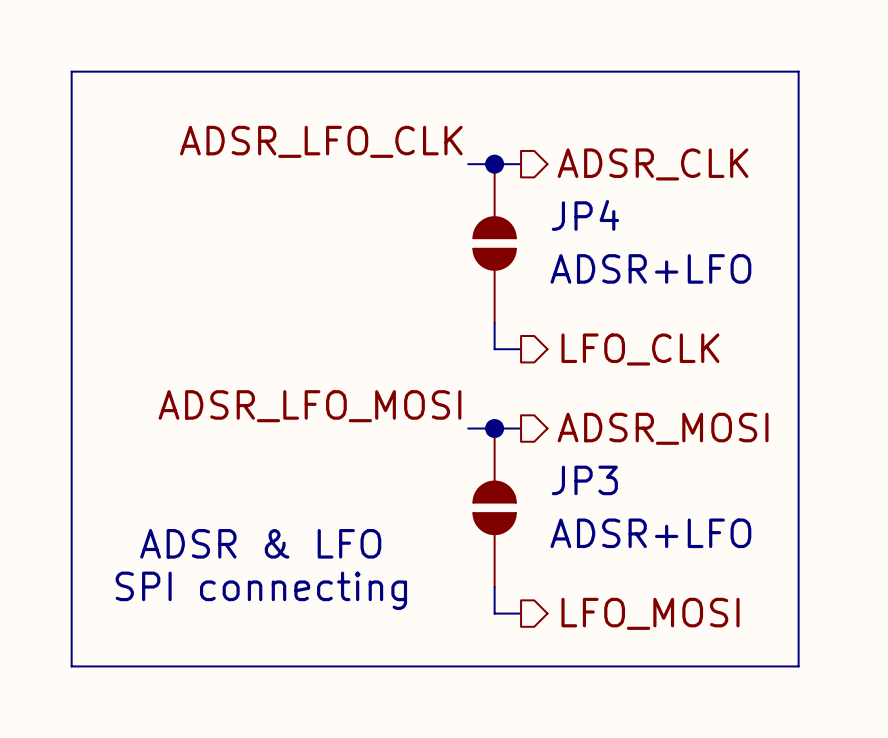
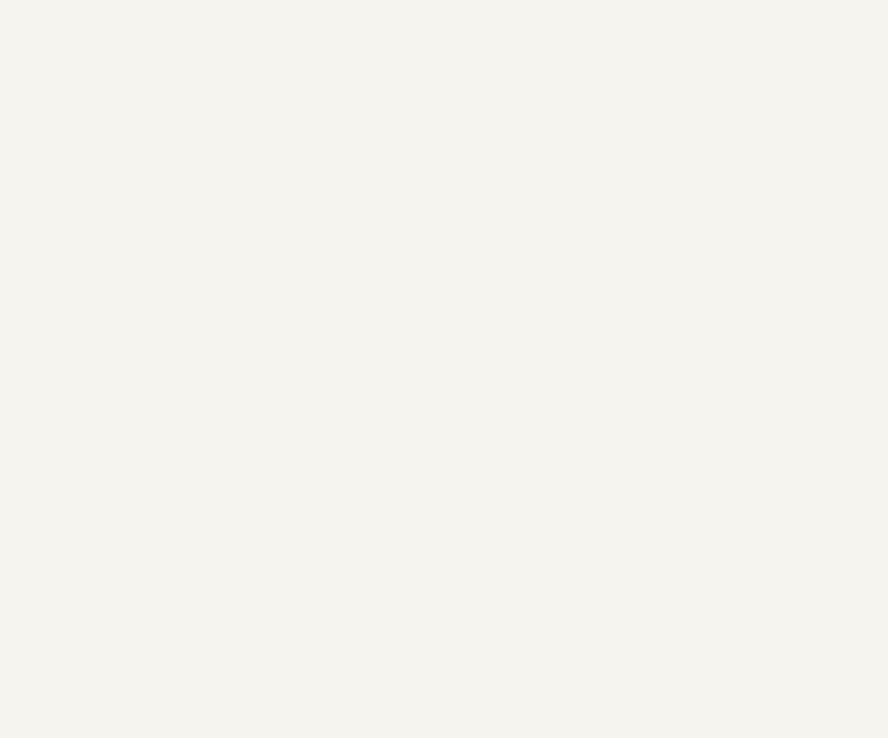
line: (71, 71) (798, 71) (798, 666) (71, 666) (71, 71) -> none
label: ADSR_LFO_CLK (321, 141) -> none
wire: (468, 164) (521, 164) -> none
junction: (494, 164) -> none
hierarchical label: ADSR_CLK (653, 164) -> none
JP4: ADSR+LFO (494, 243) -> none
wire: (494, 322) (494, 349) (521, 349) -> none
hierarchical label: LFO_CLK (640, 349) -> none
label: ADSR_LFO_MOSI (310, 406) -> none
wire: (468, 428) (521, 428) -> none
junction: (494, 428) -> none
hierarchical label: ADSR_MOSI (663, 428) -> none
JP3: ADSR+LFO (494, 507) -> none
text: ADSR & LFO (260, 543) -> none
wire: (494, 587) (494, 613) (521, 613) -> none
text: SPI connecting (261, 590) -> none
hierarchical label: LFO_MOSI (650, 613) -> none

